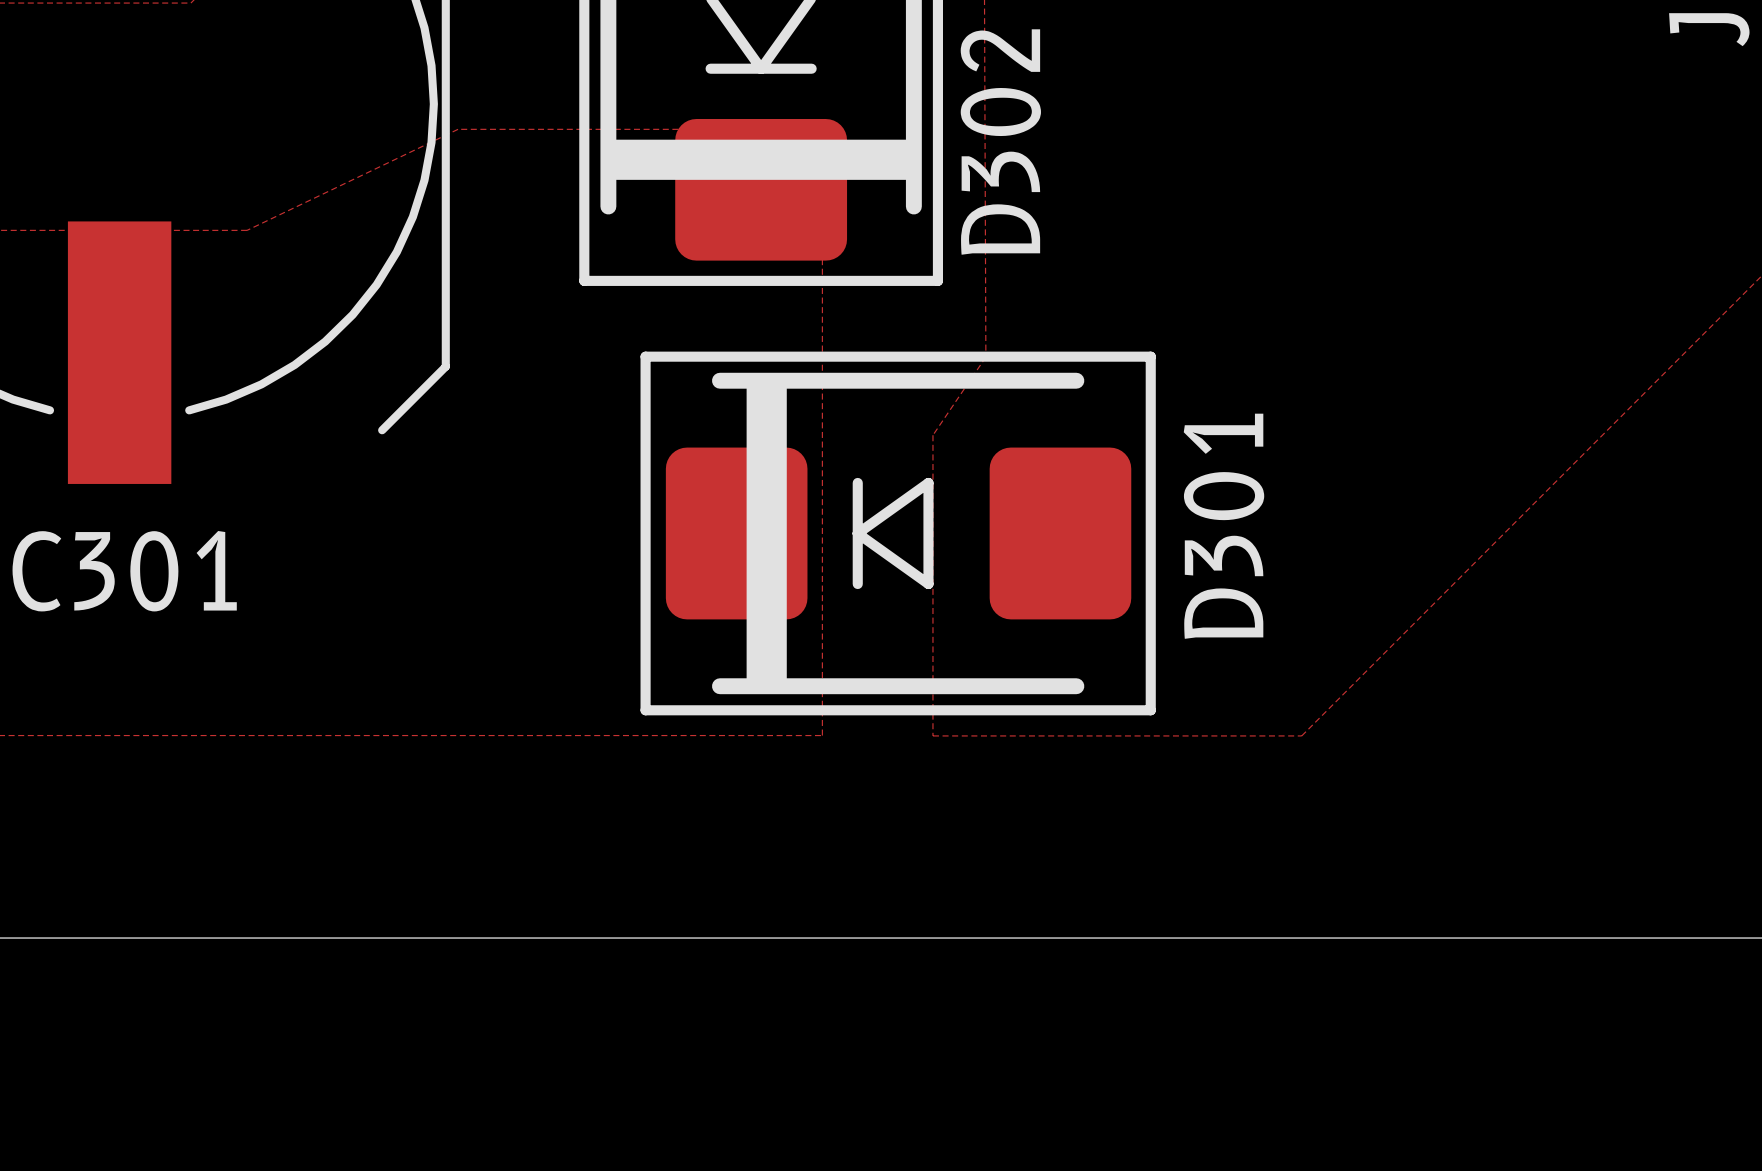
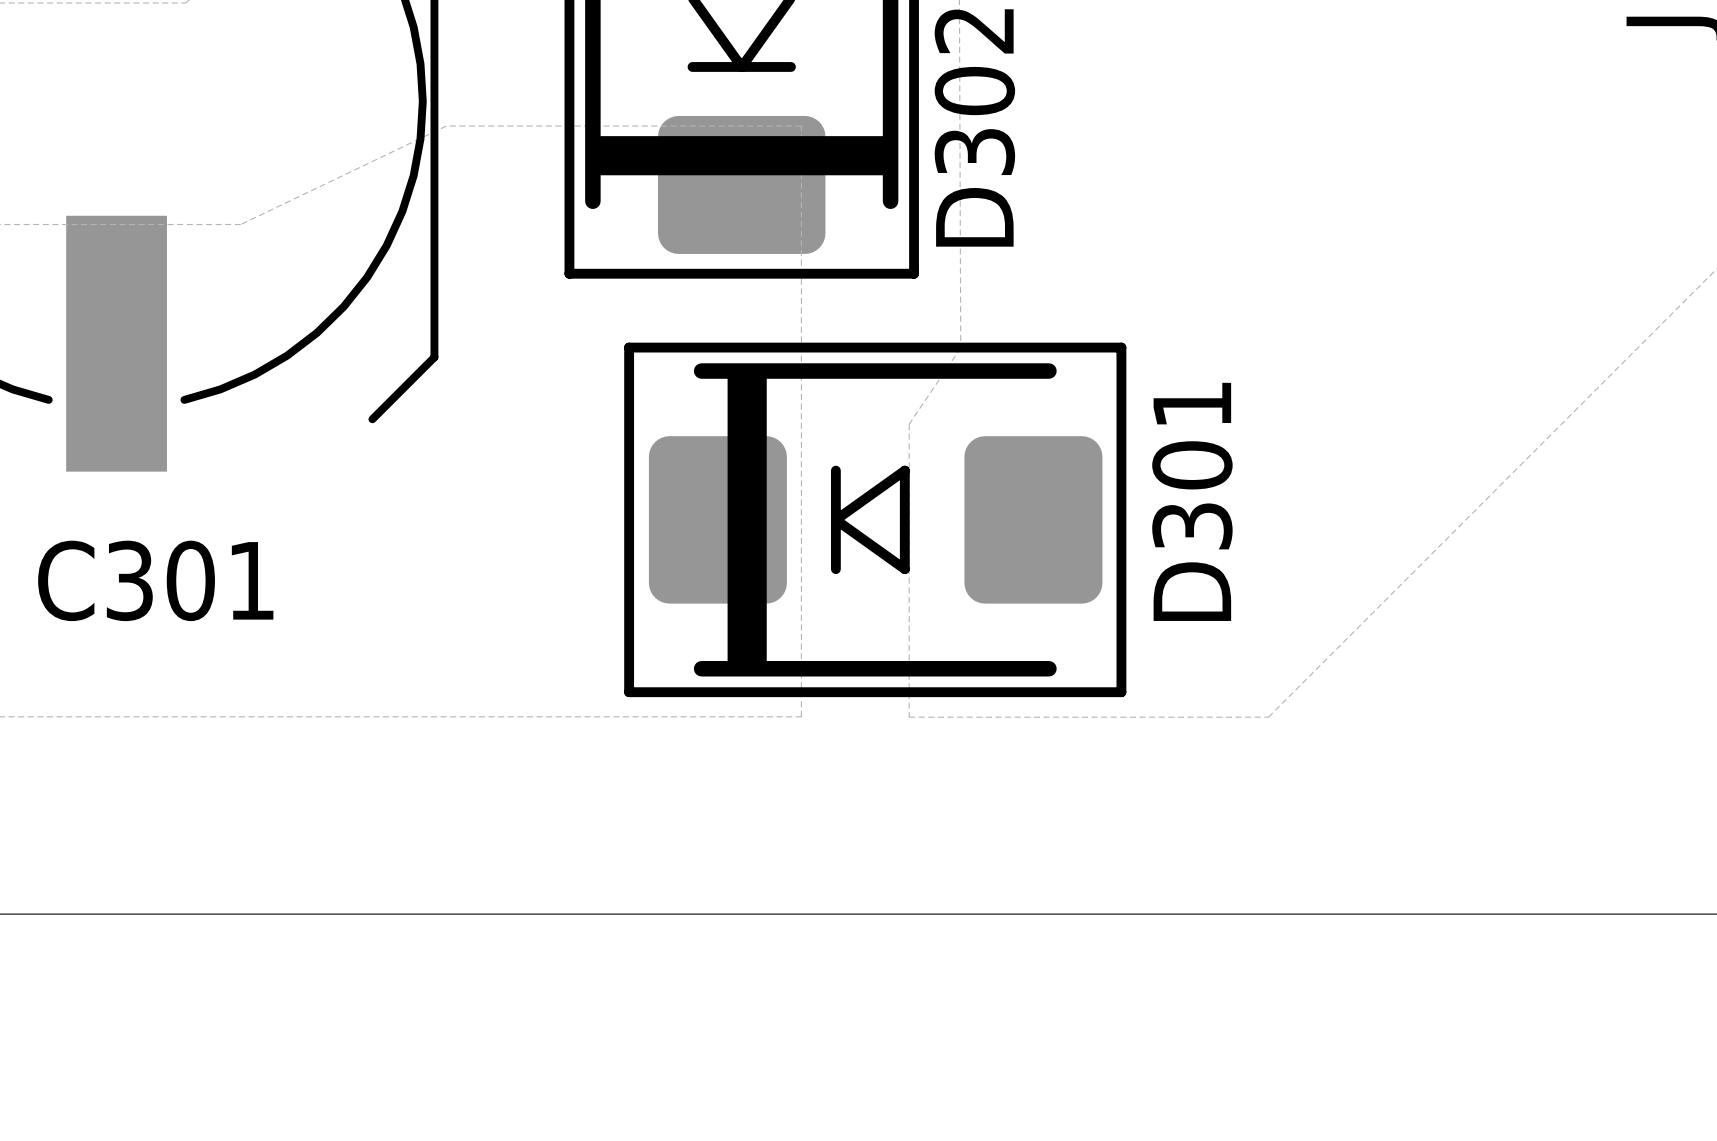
C301 name position: C301 (124, 571) -> C301 (155, 580)

